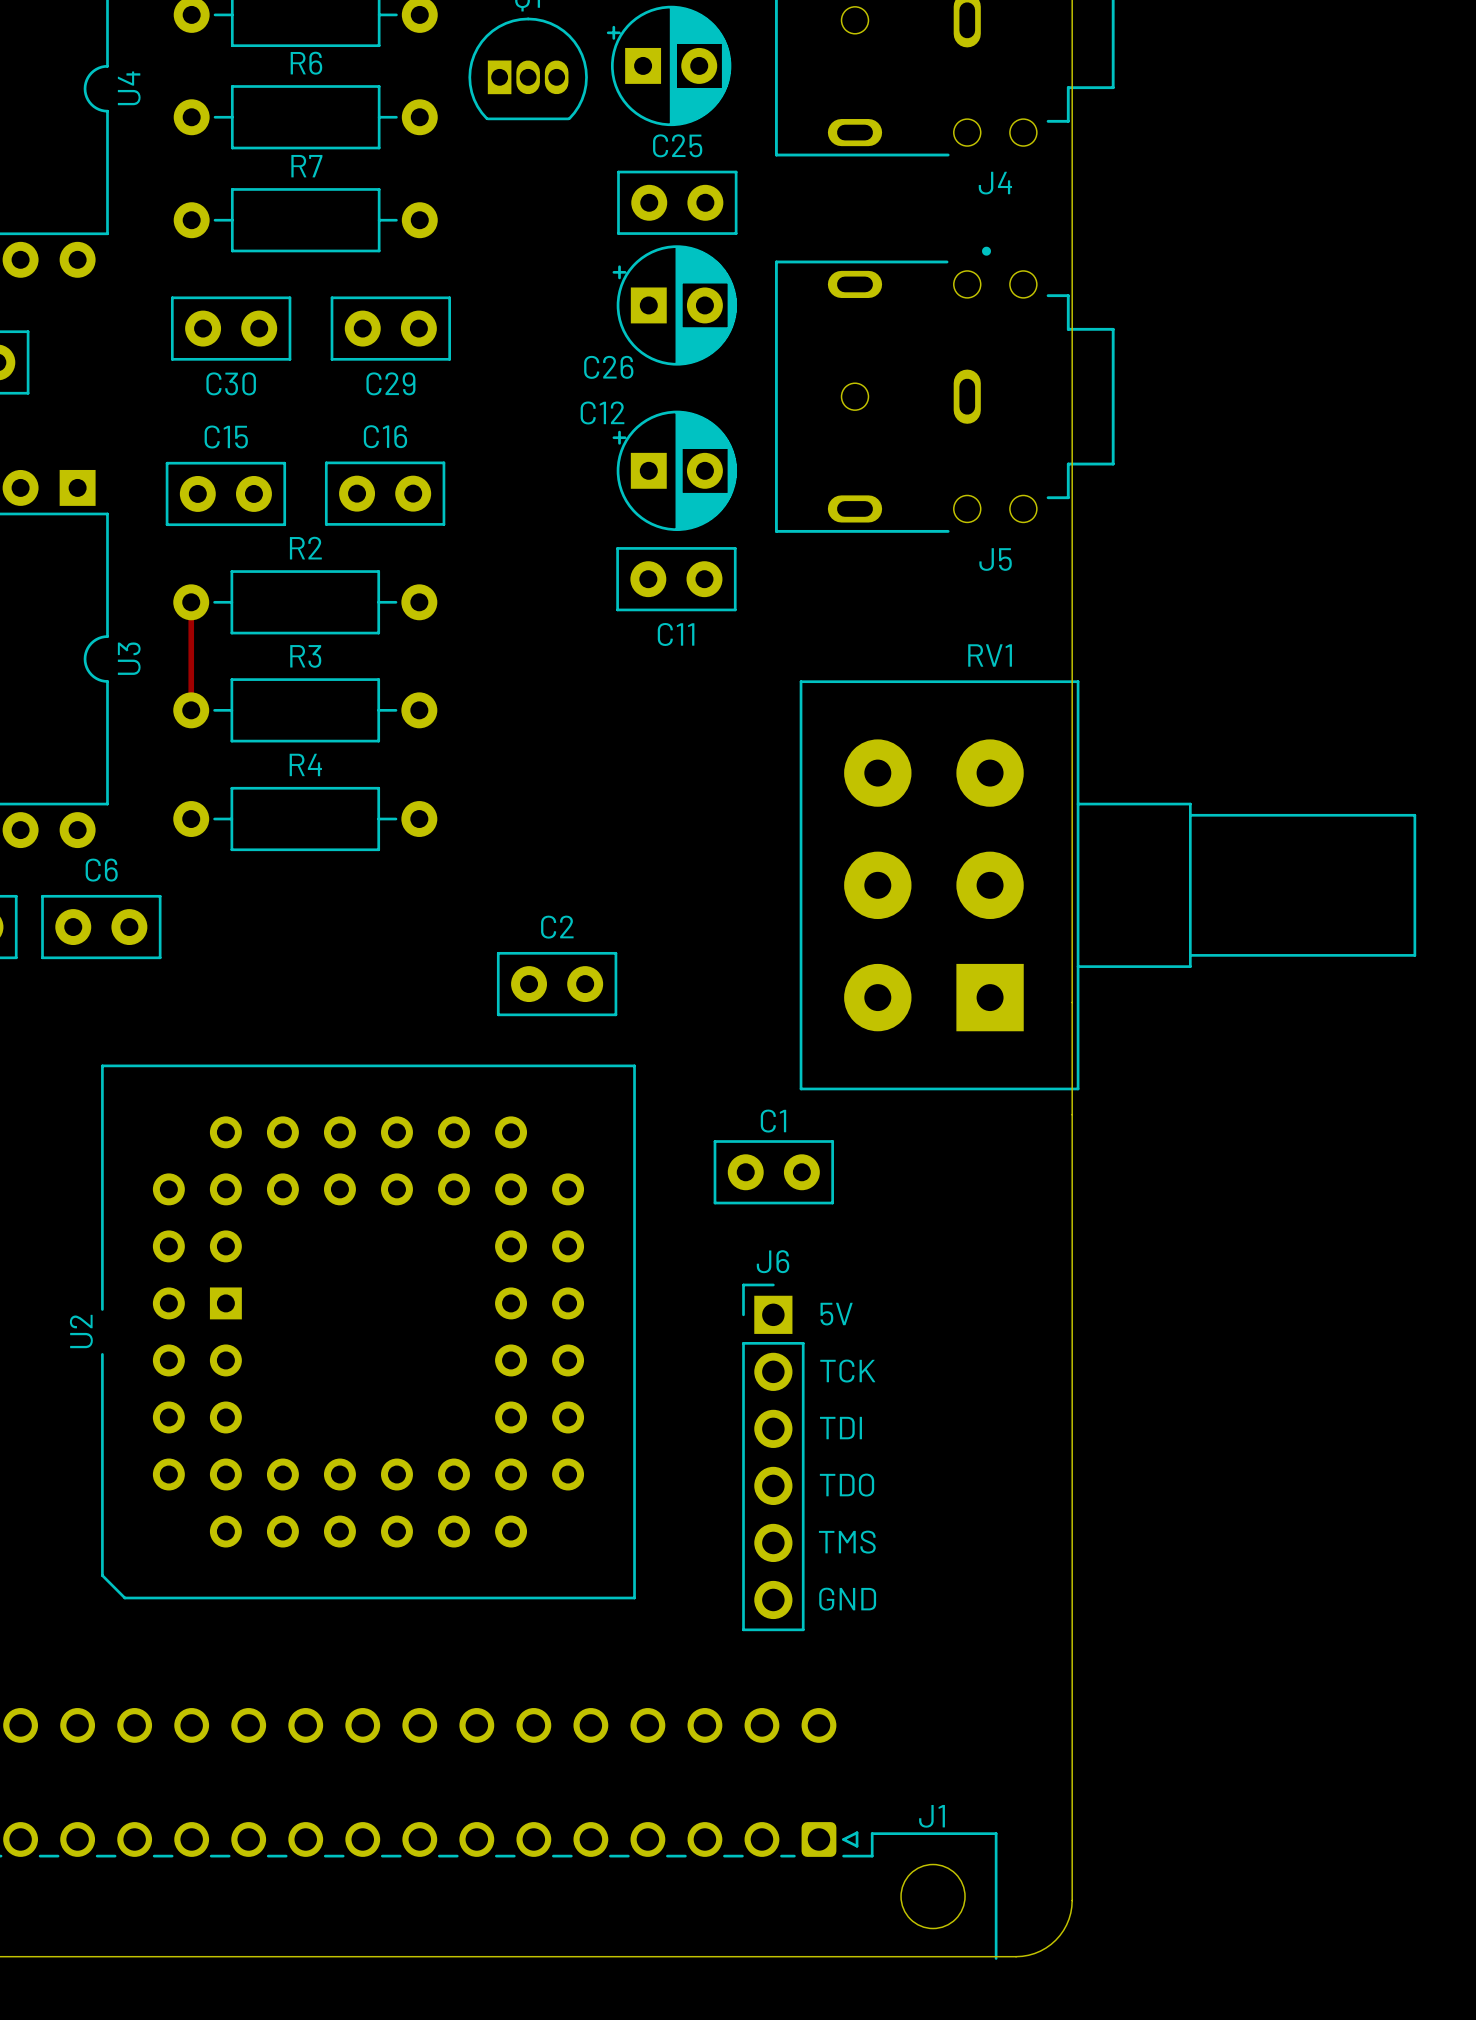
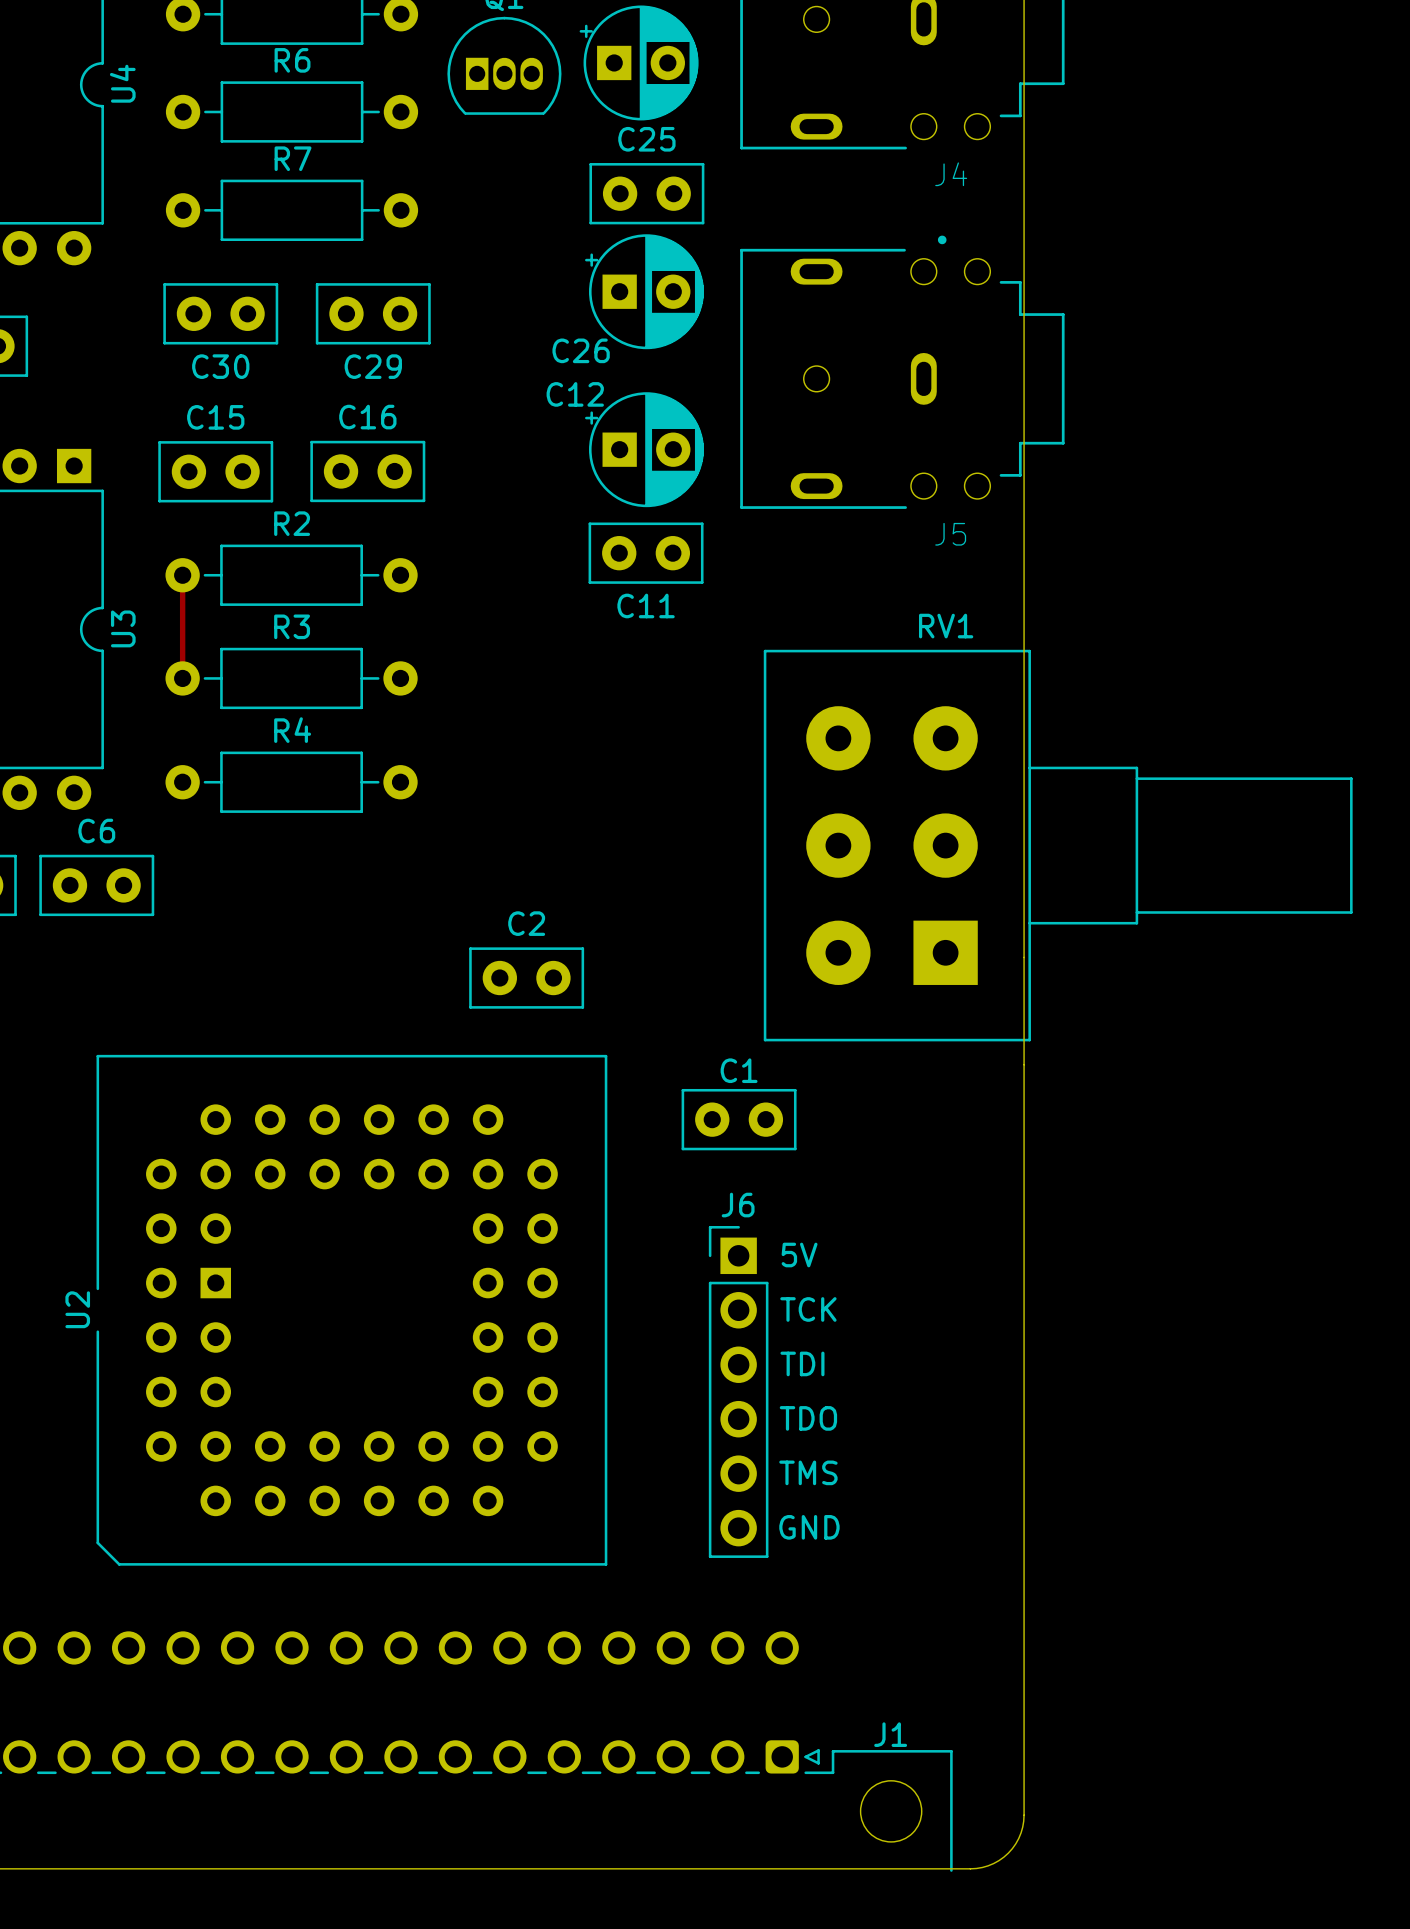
C2 position: (557, 984) -> (526, 978)
U2 position: (368, 1331) -> (351, 1310)

